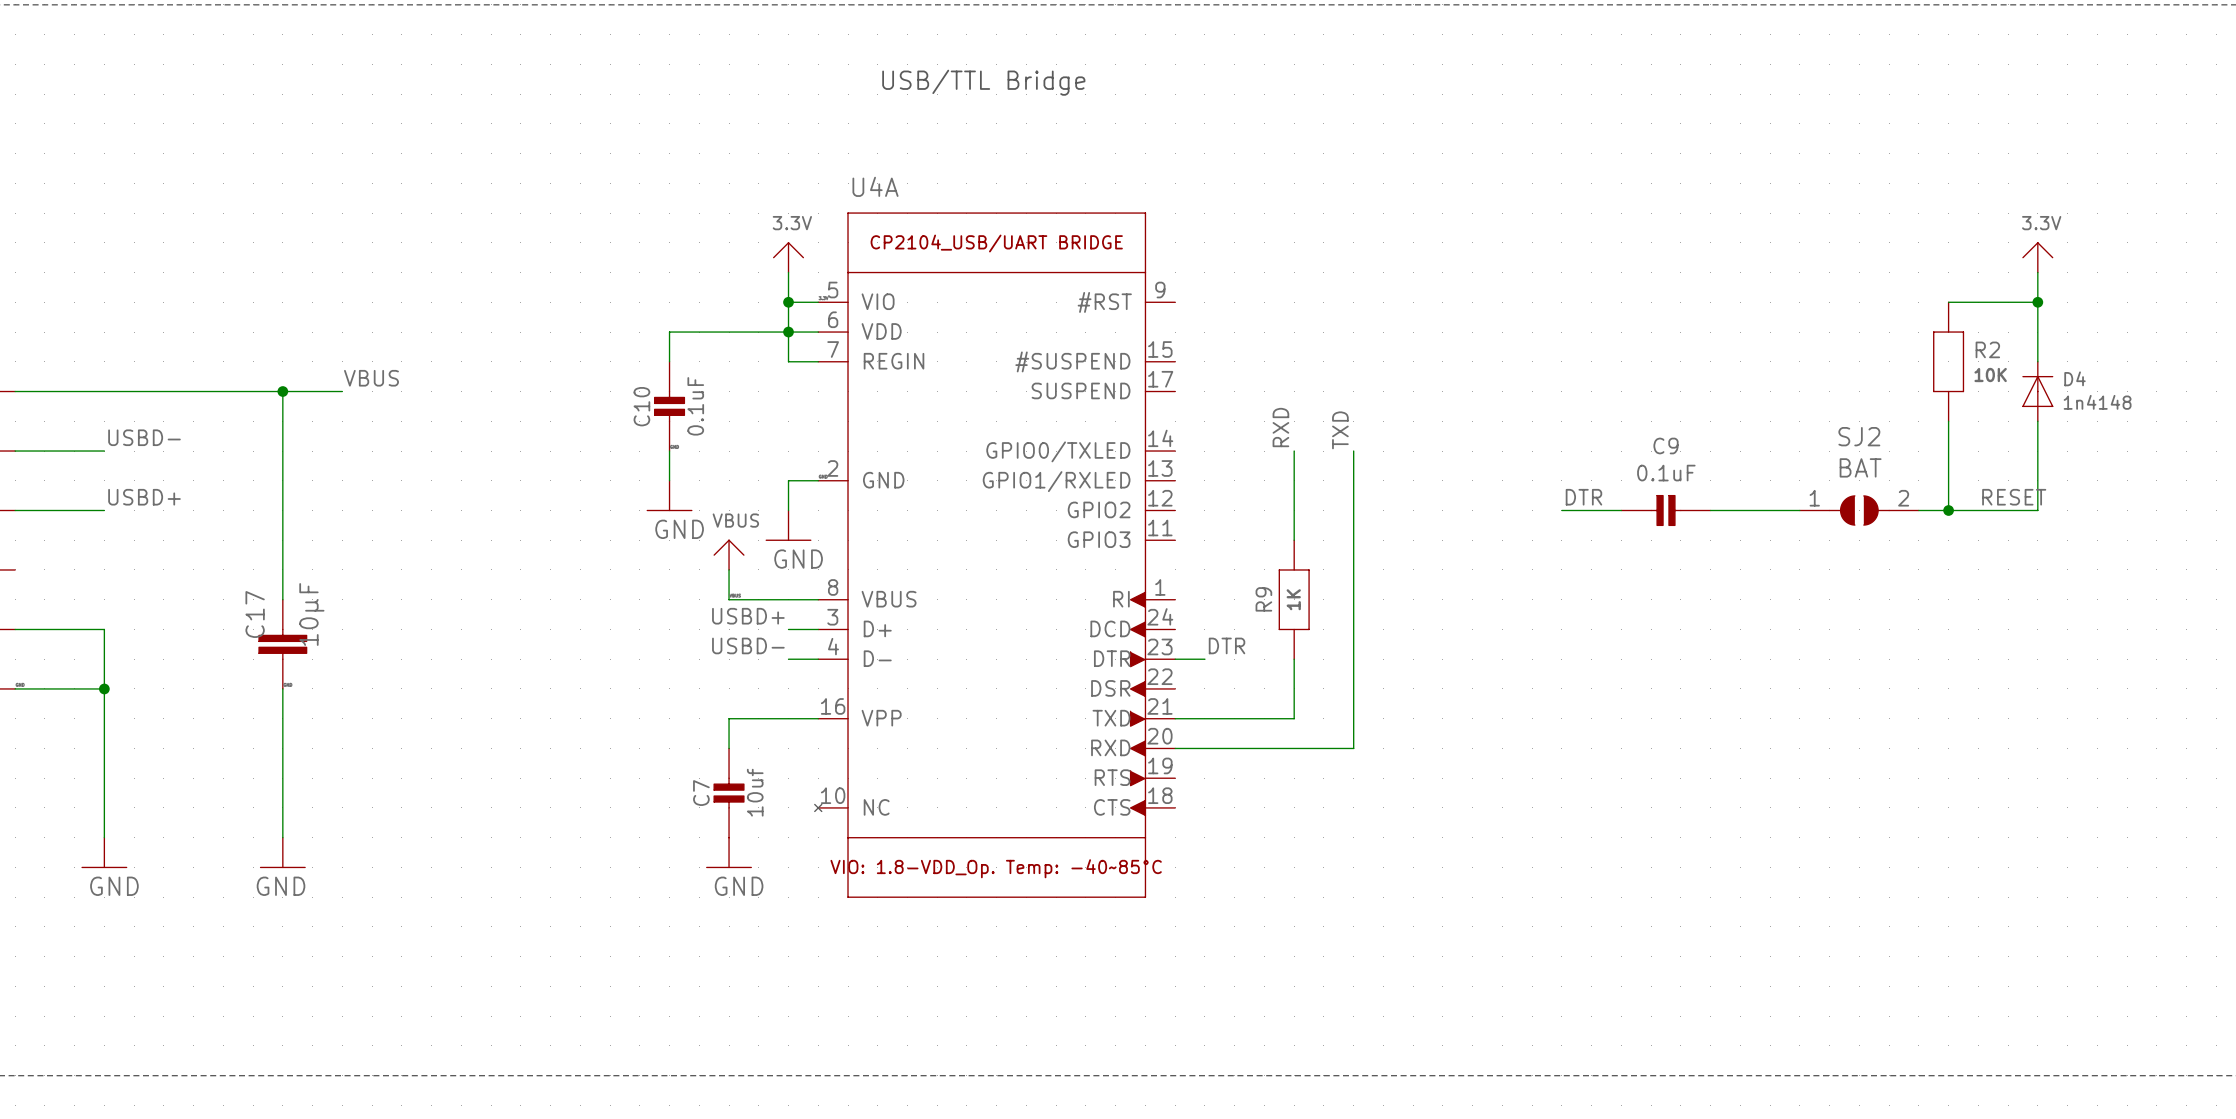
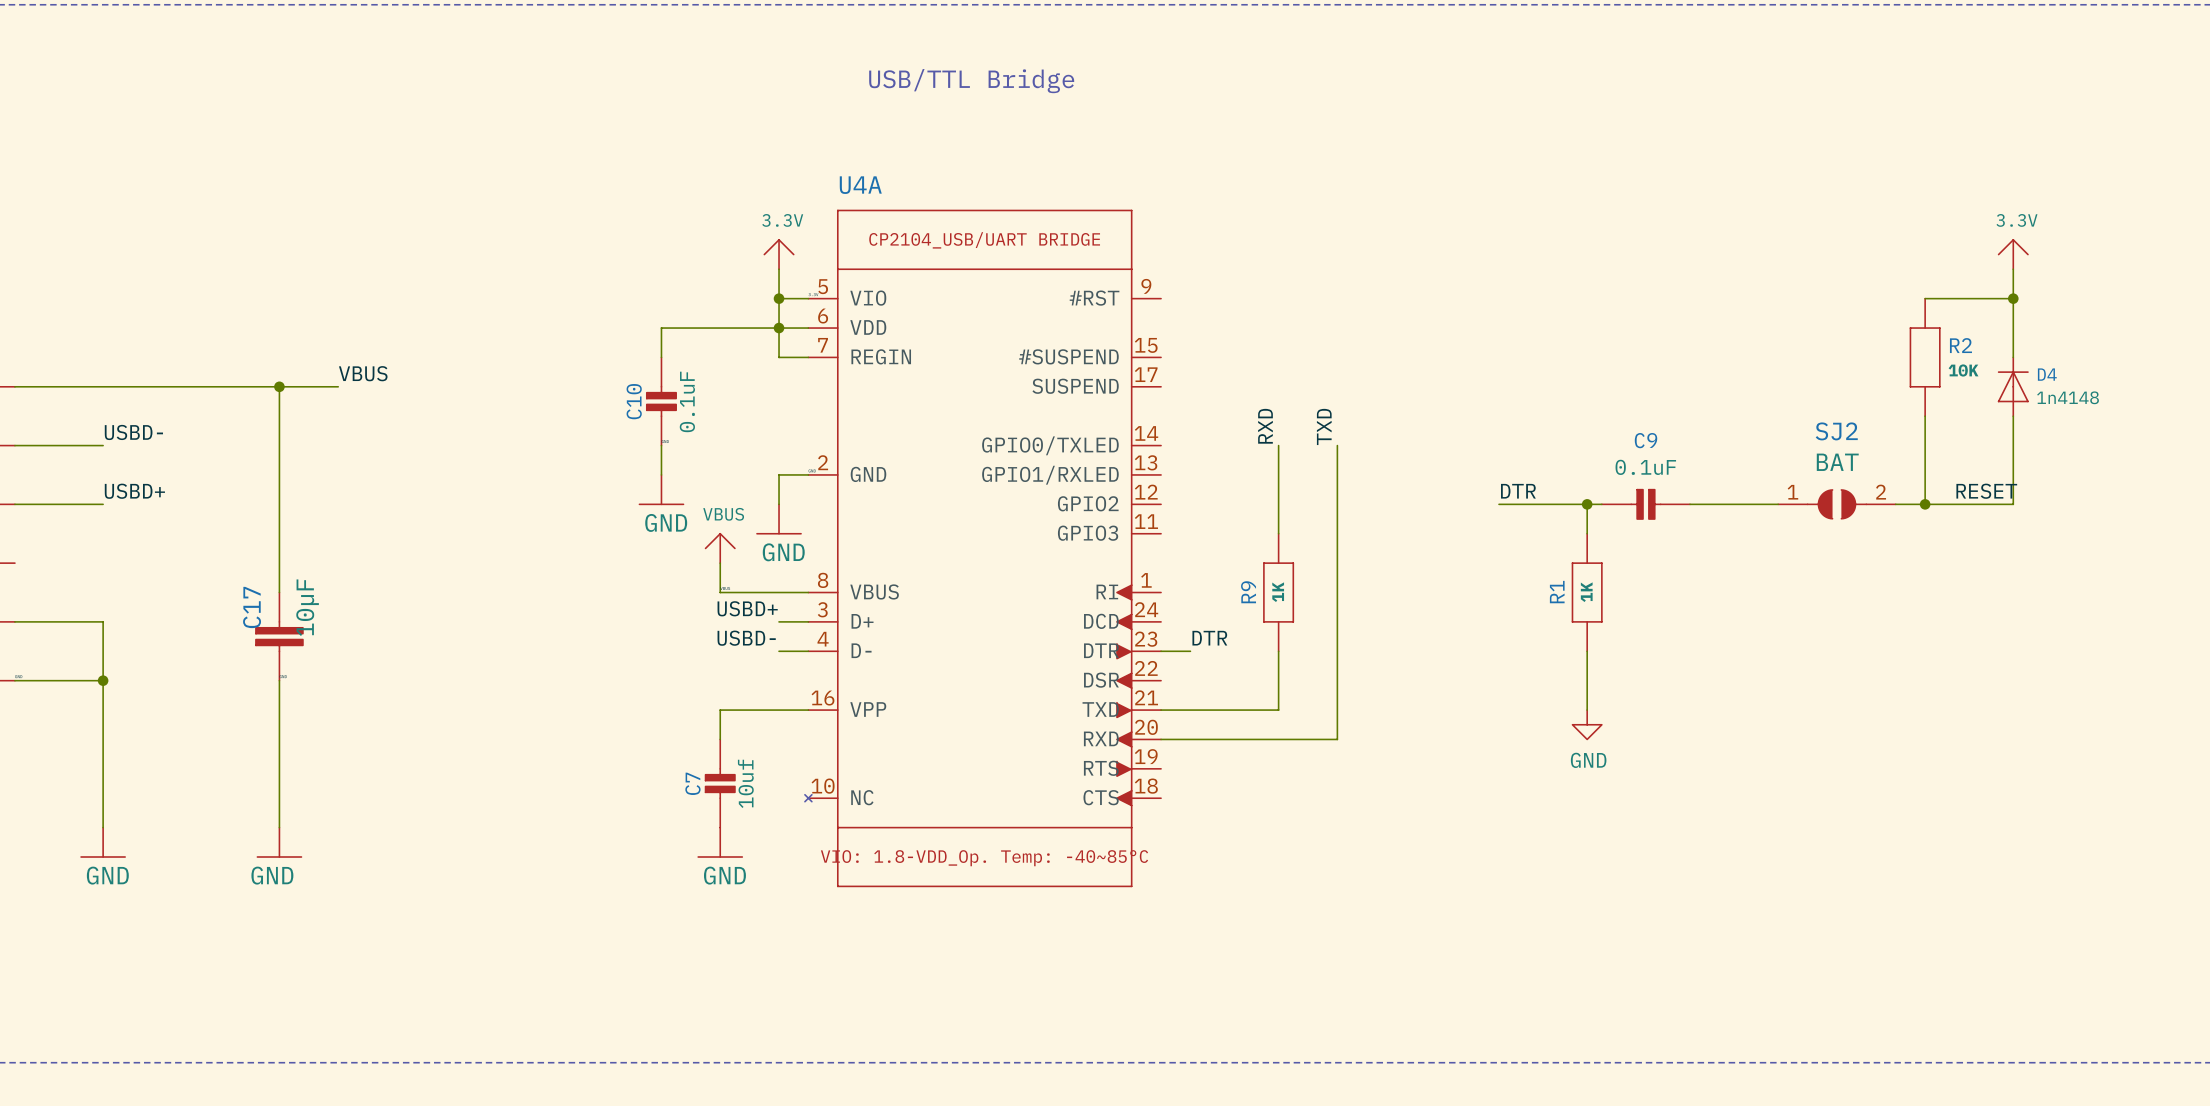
label position: DTR (1583, 497) -> DTR (1518, 491)
wire: none -> (1499, 504) (1543, 504)
wire: none -> (1587, 504) (1587, 533)
junction: none -> (1587, 504)
R1: none -> 1K (1587, 592)
wire: none -> (1587, 651) (1587, 710)
power symbol: none -> GND (1587, 724)

